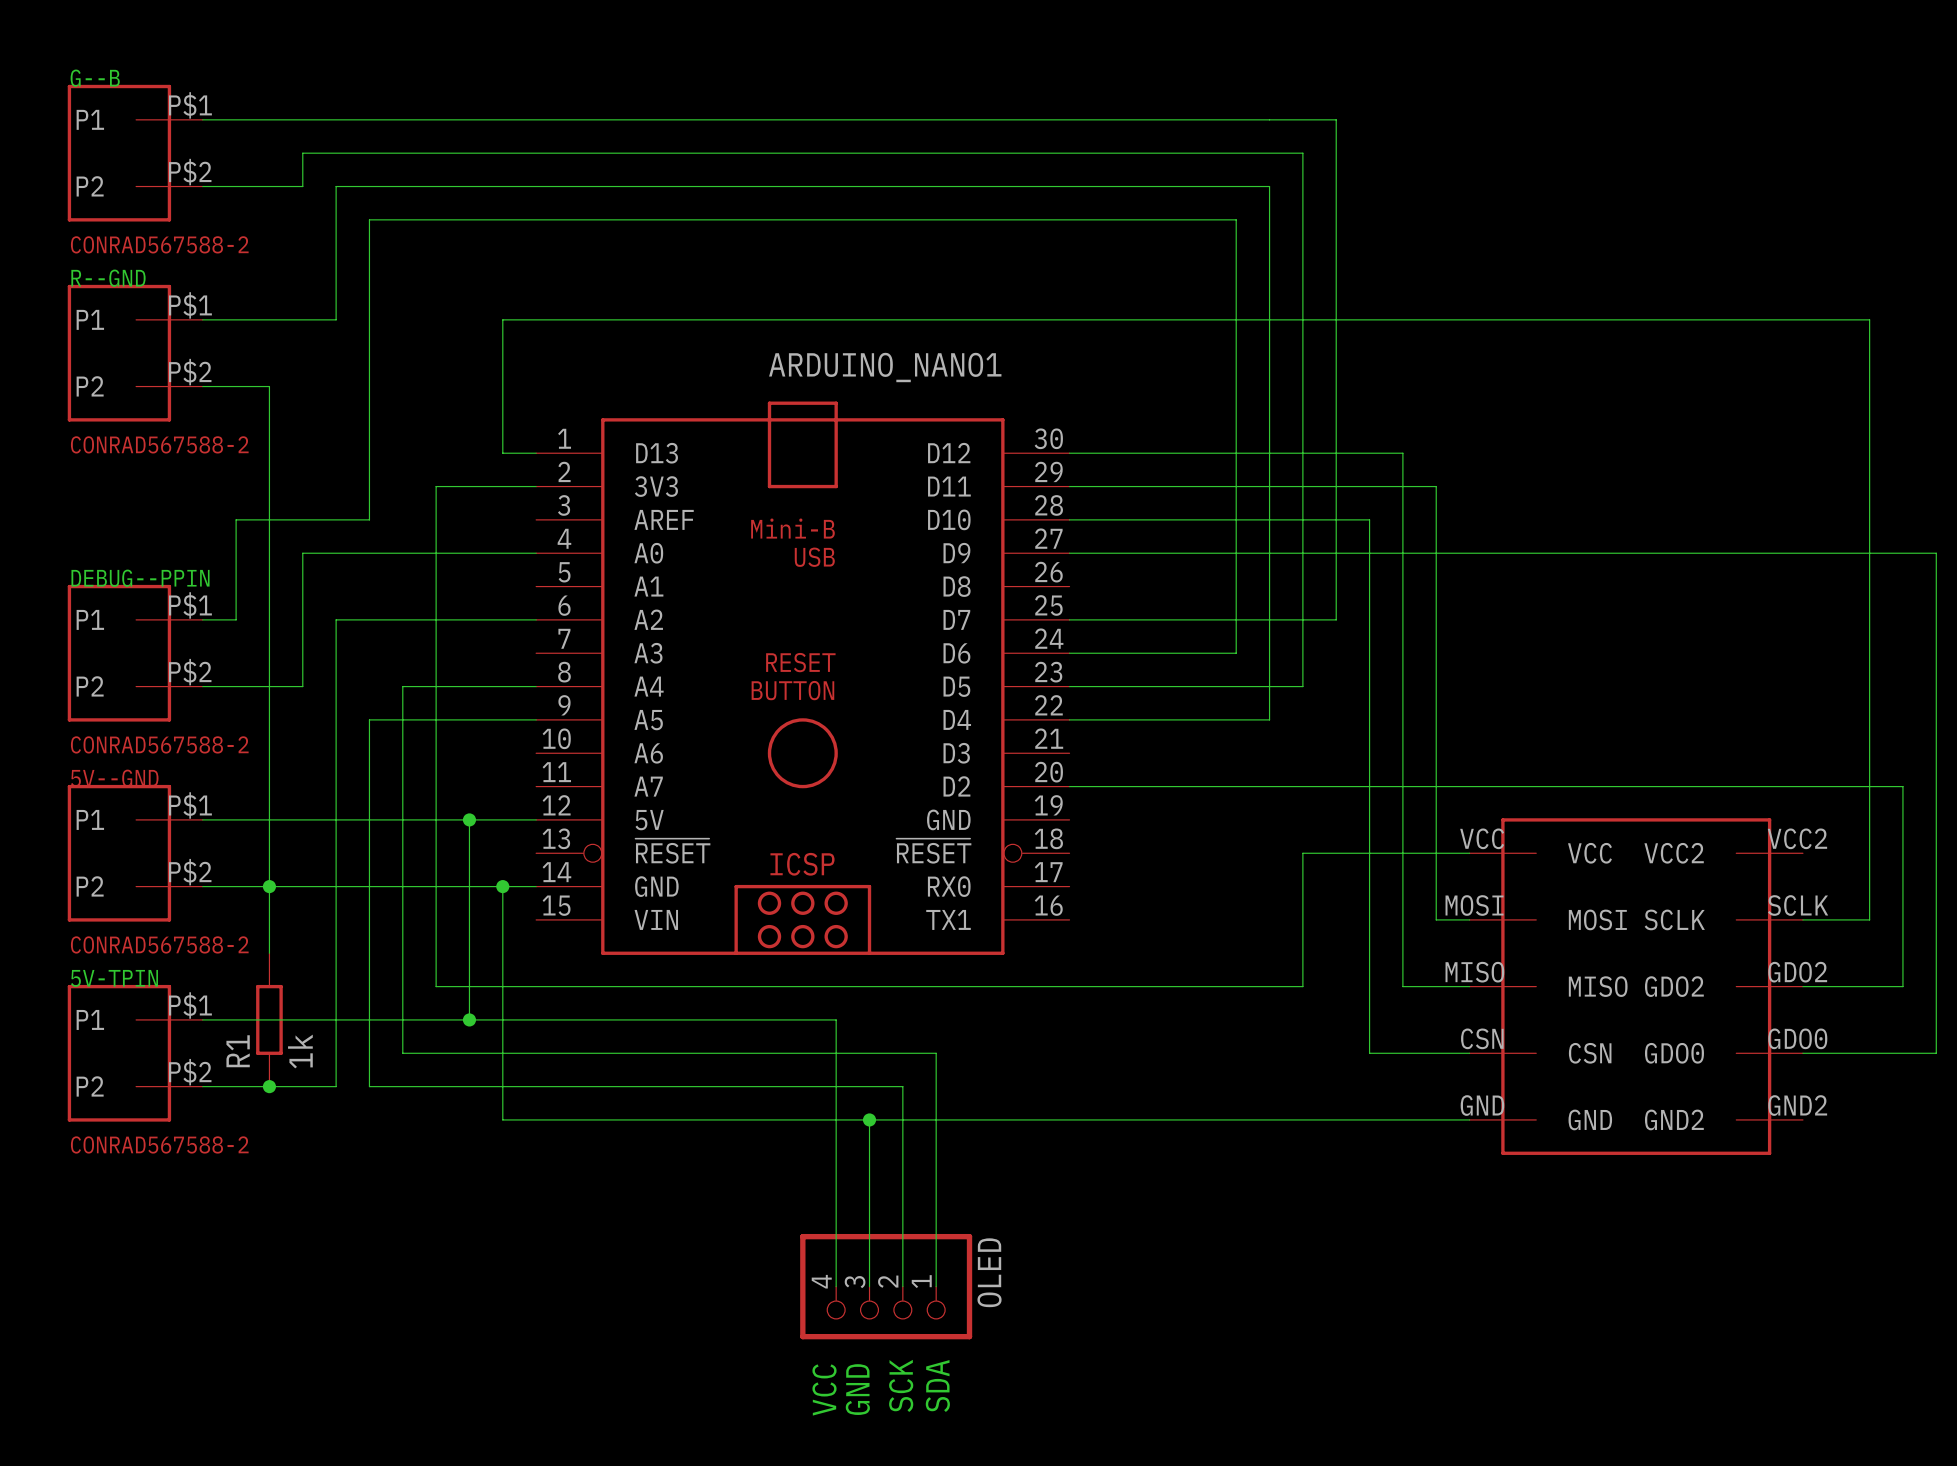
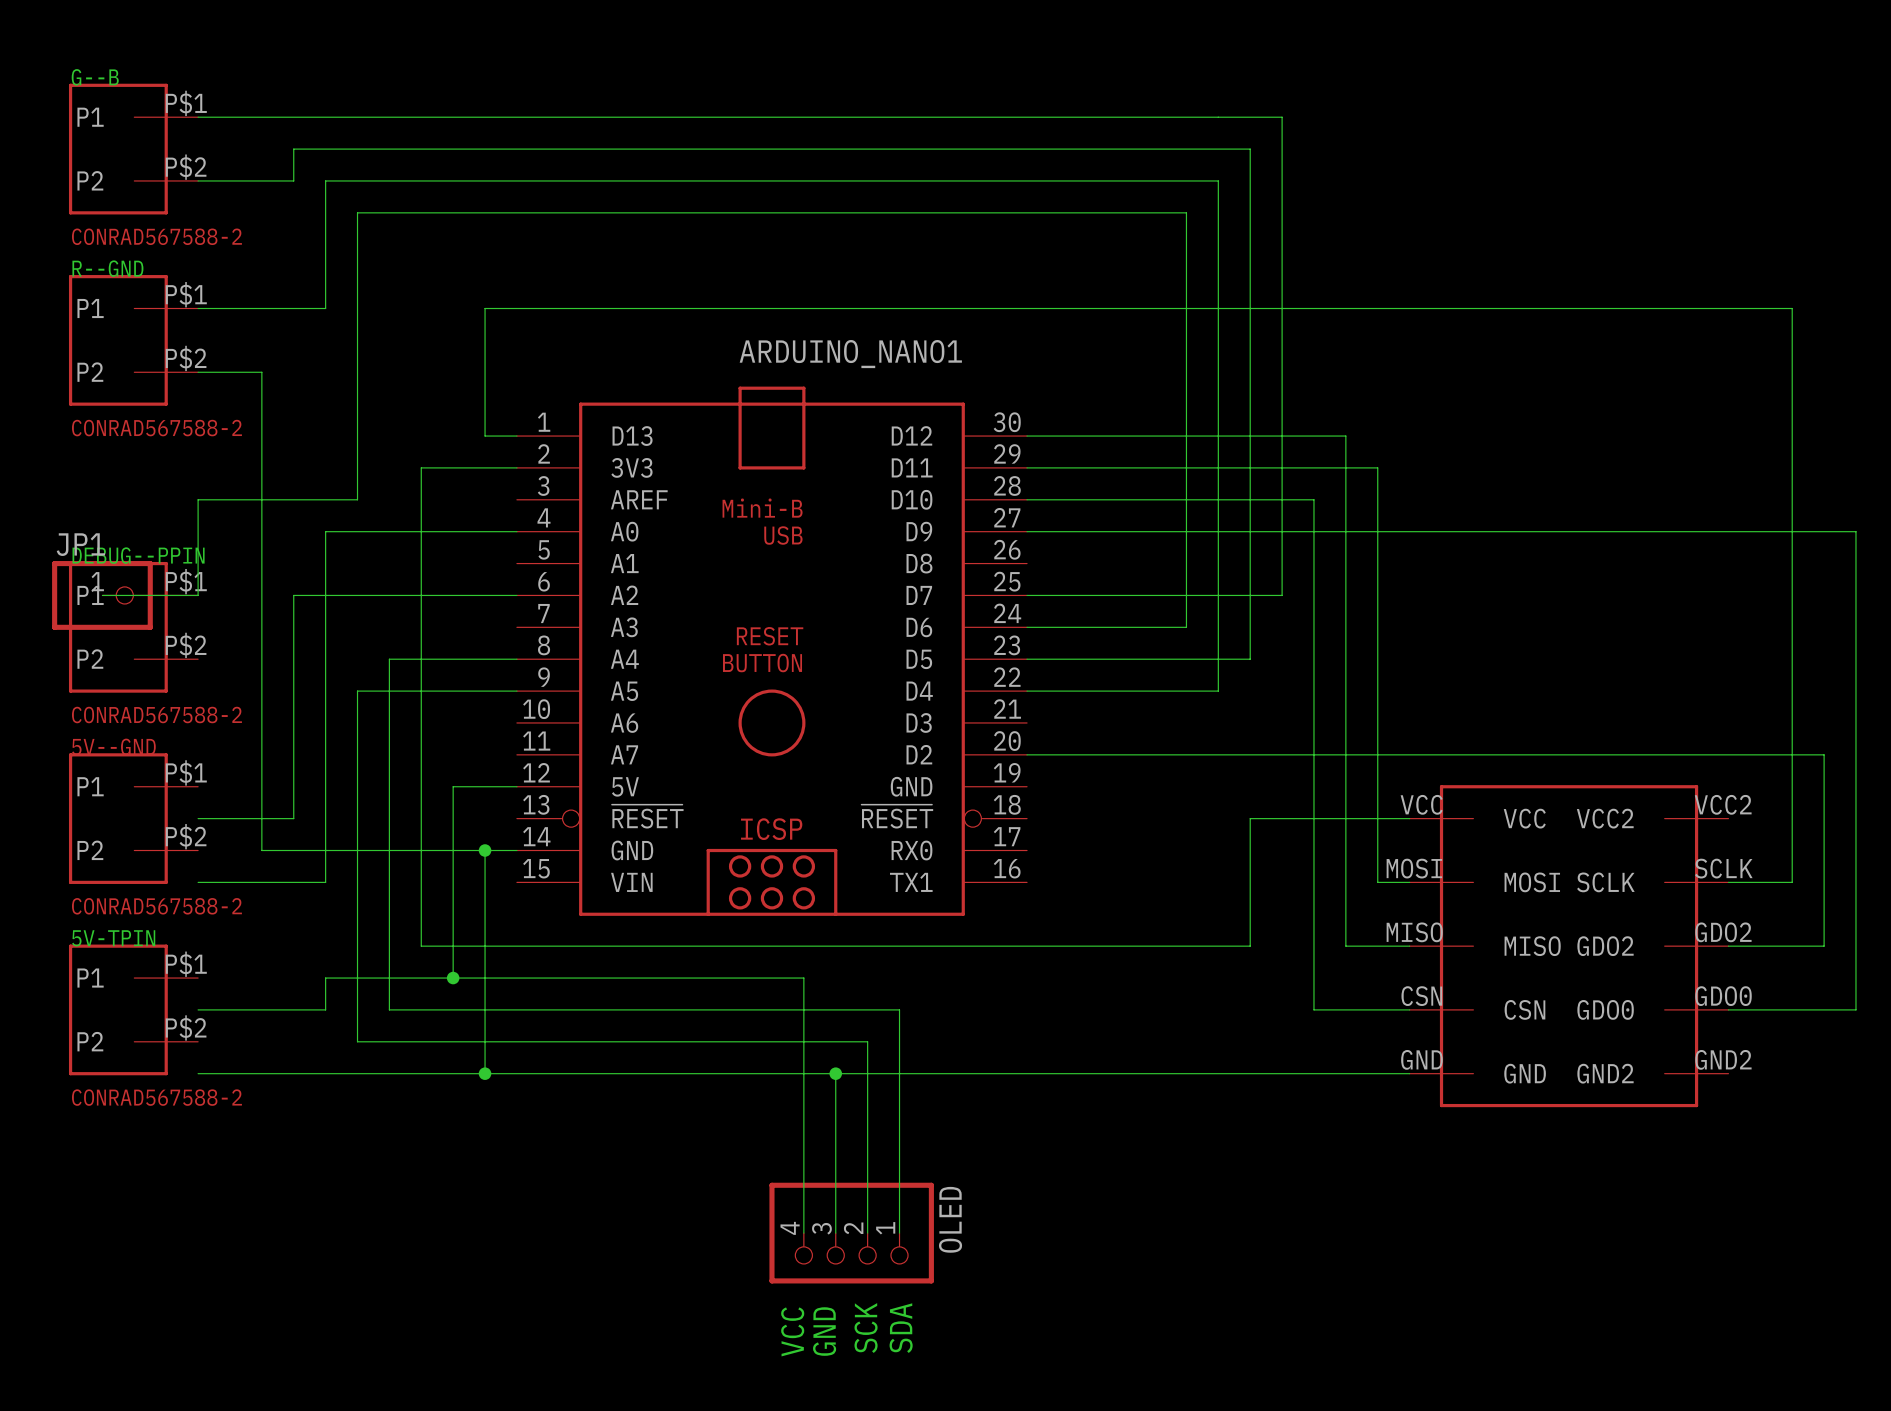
wire: (236, 519) (236, 619) (202, 619) -> (229, 499) (198, 499) (198, 595) (102, 595)
wire: (336, 553) (302, 553) (302, 619) -> (325, 531) (325, 595) (293, 595)
JP1: none -> (102, 595)
wire: (202, 686) (302, 686) -> (198, 818) (293, 818) (293, 659)
wire: (202, 819) (469, 819) -> none
junction: (469, 819) -> none
wire: (202, 886) (269, 886) (269, 953) -> none
junction: (269, 886) -> none
wire: (336, 919) (336, 1019) (202, 1019) -> (325, 882) (198, 882)
R1: 1k (269, 1019) -> none
wire: (336, 1053) (336, 1086) (202, 1086) -> (325, 1009) (198, 1009)
junction: (269, 1086) -> none
wire: none -> (198, 1073) (485, 1073)
junction: none -> (485, 1073)

